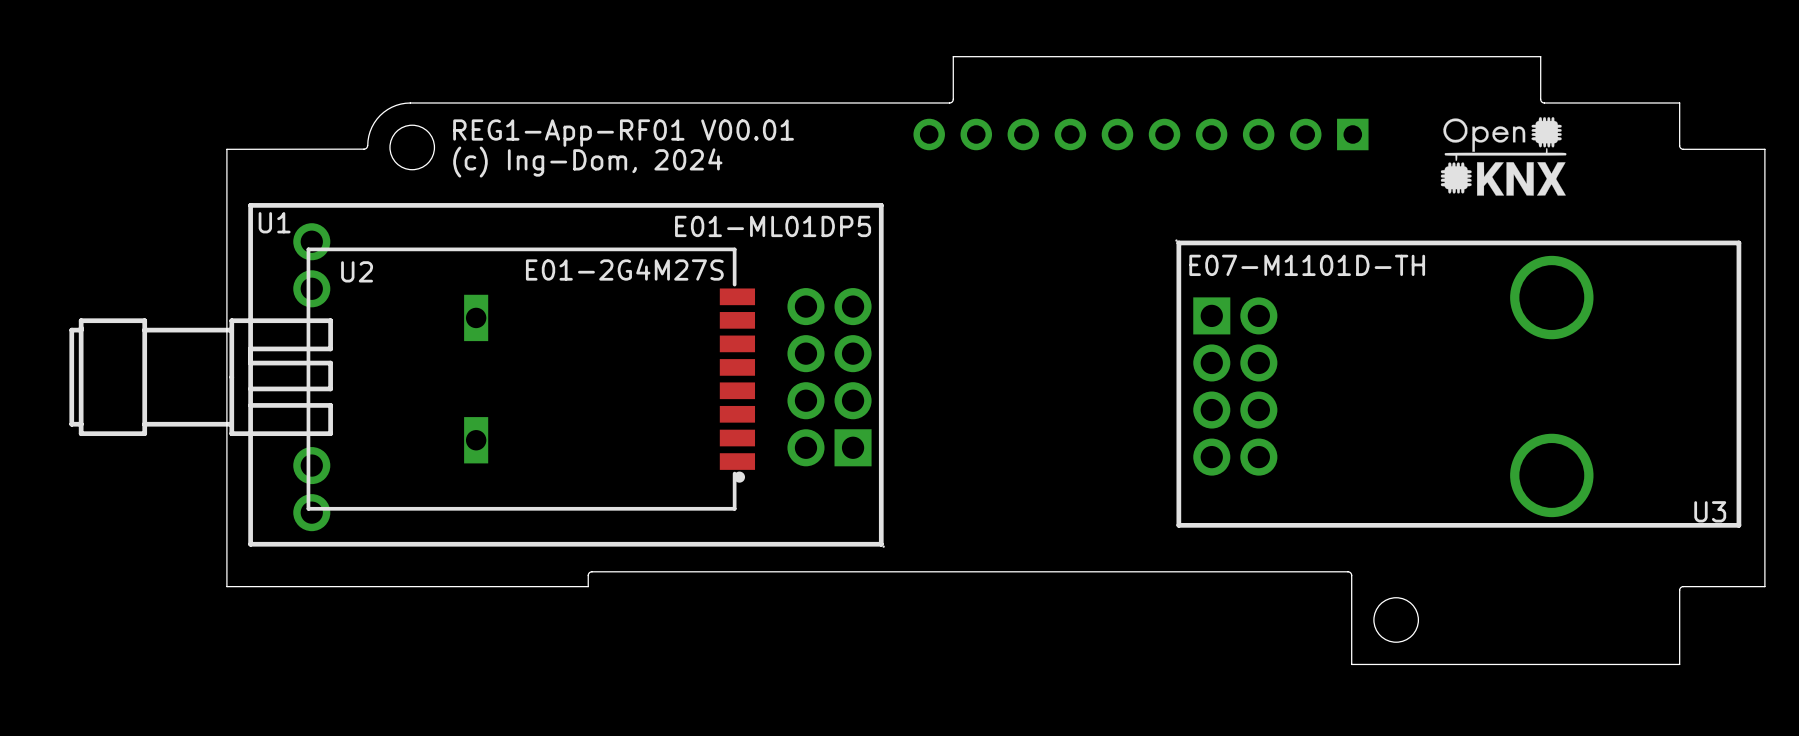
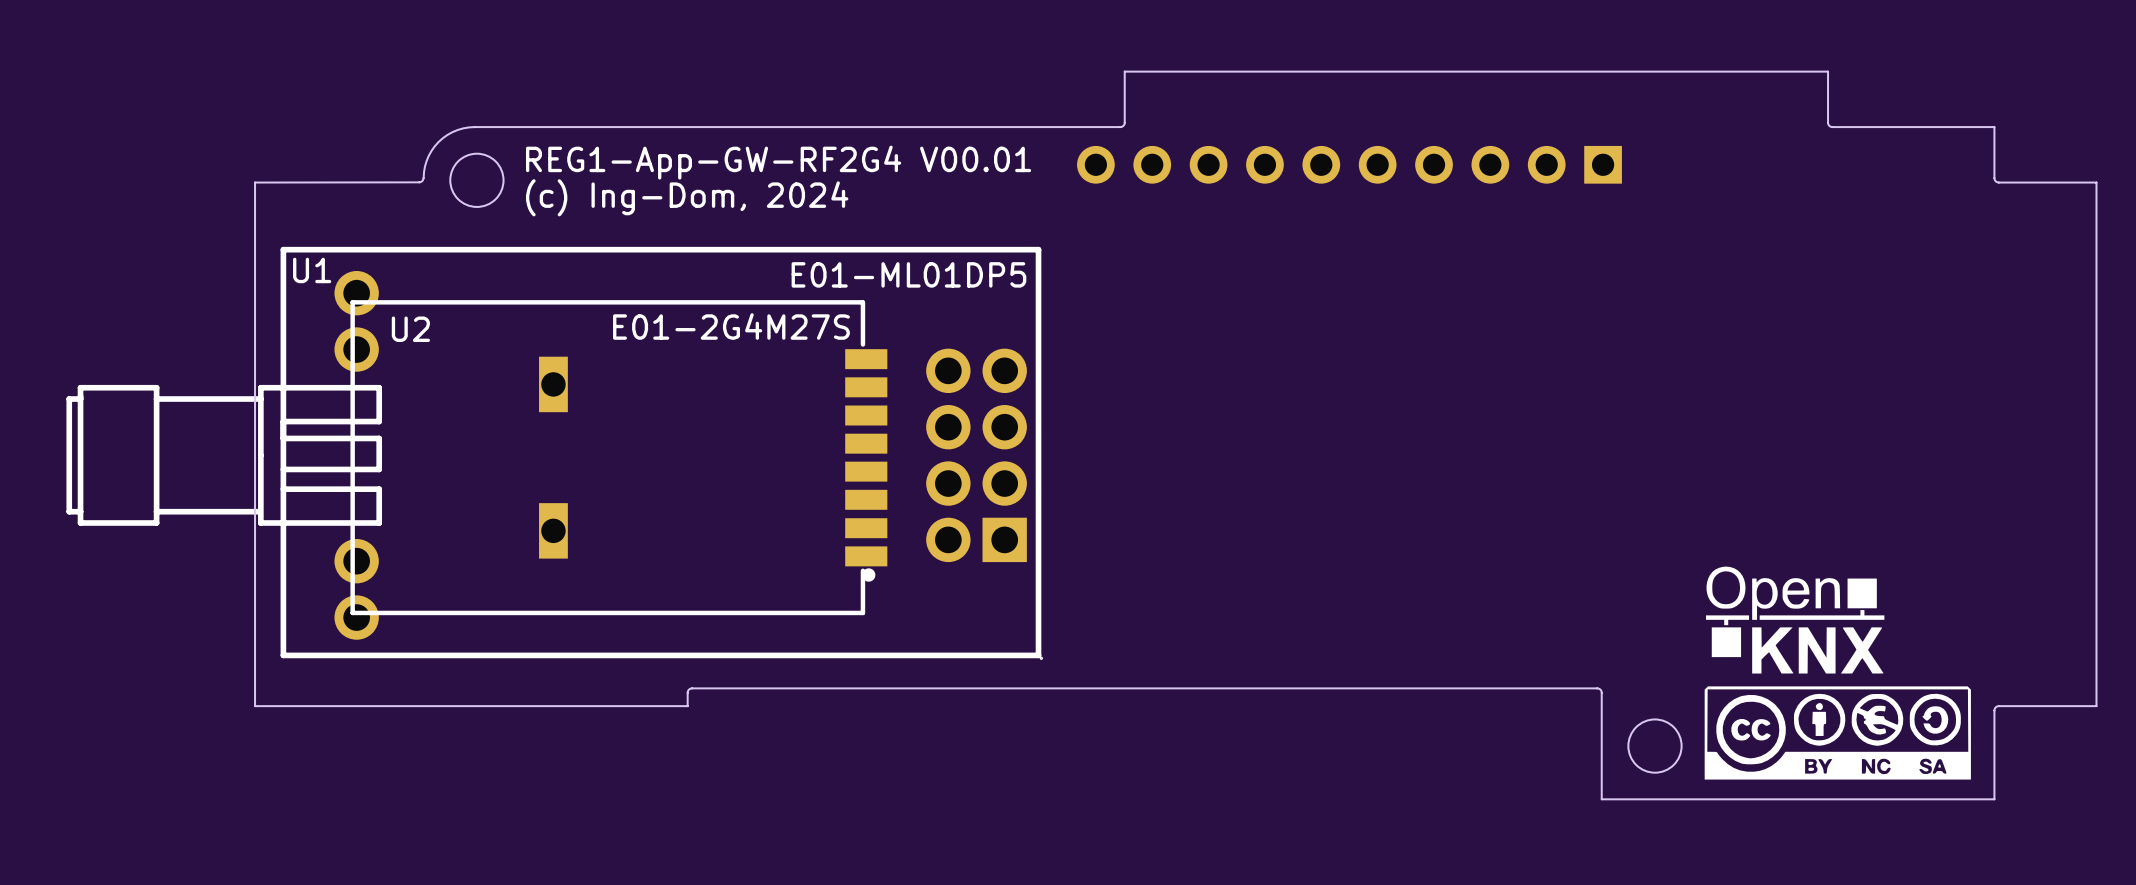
drawing: [1440, 117, 1567, 196] -> none
text: REG1-App-RF01 V00.01 (623, 133) -> REG1-App-GW-RF2G4 V00.01 (778, 162)
U3: E07-M1101D-TH (1458, 383) -> none
drawing: none -> [1704, 566, 1971, 780]

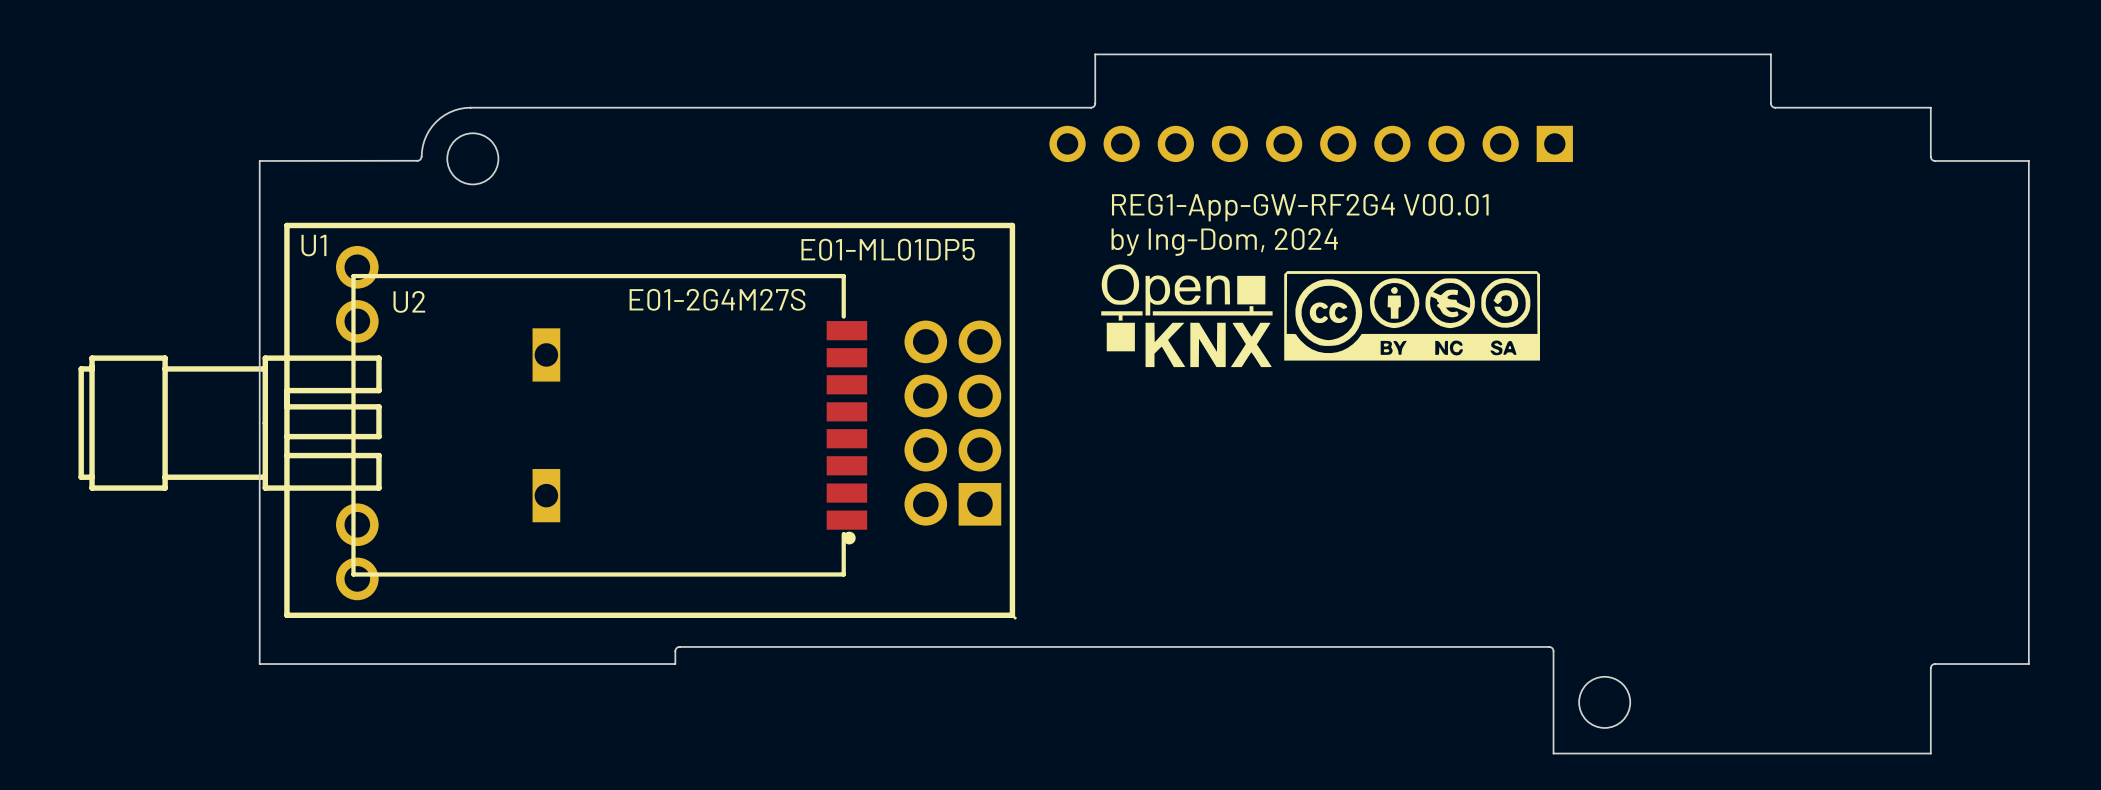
text: REG1-App-GW-RF2G4 V00.01 (778, 162) -> none
text: (c) Ing-Dom, 2024 (687, 197) -> none
text: none -> REG1-App-GW-RF2G4 V00.01 (1300, 207)
text: none -> by Ing-Dom, 2024 (1224, 242)
drawing: none -> [1101, 264, 1273, 368]
drawing: [1706, 566, 1885, 674] -> none
drawing position: (1837, 732) -> (1412, 315)

